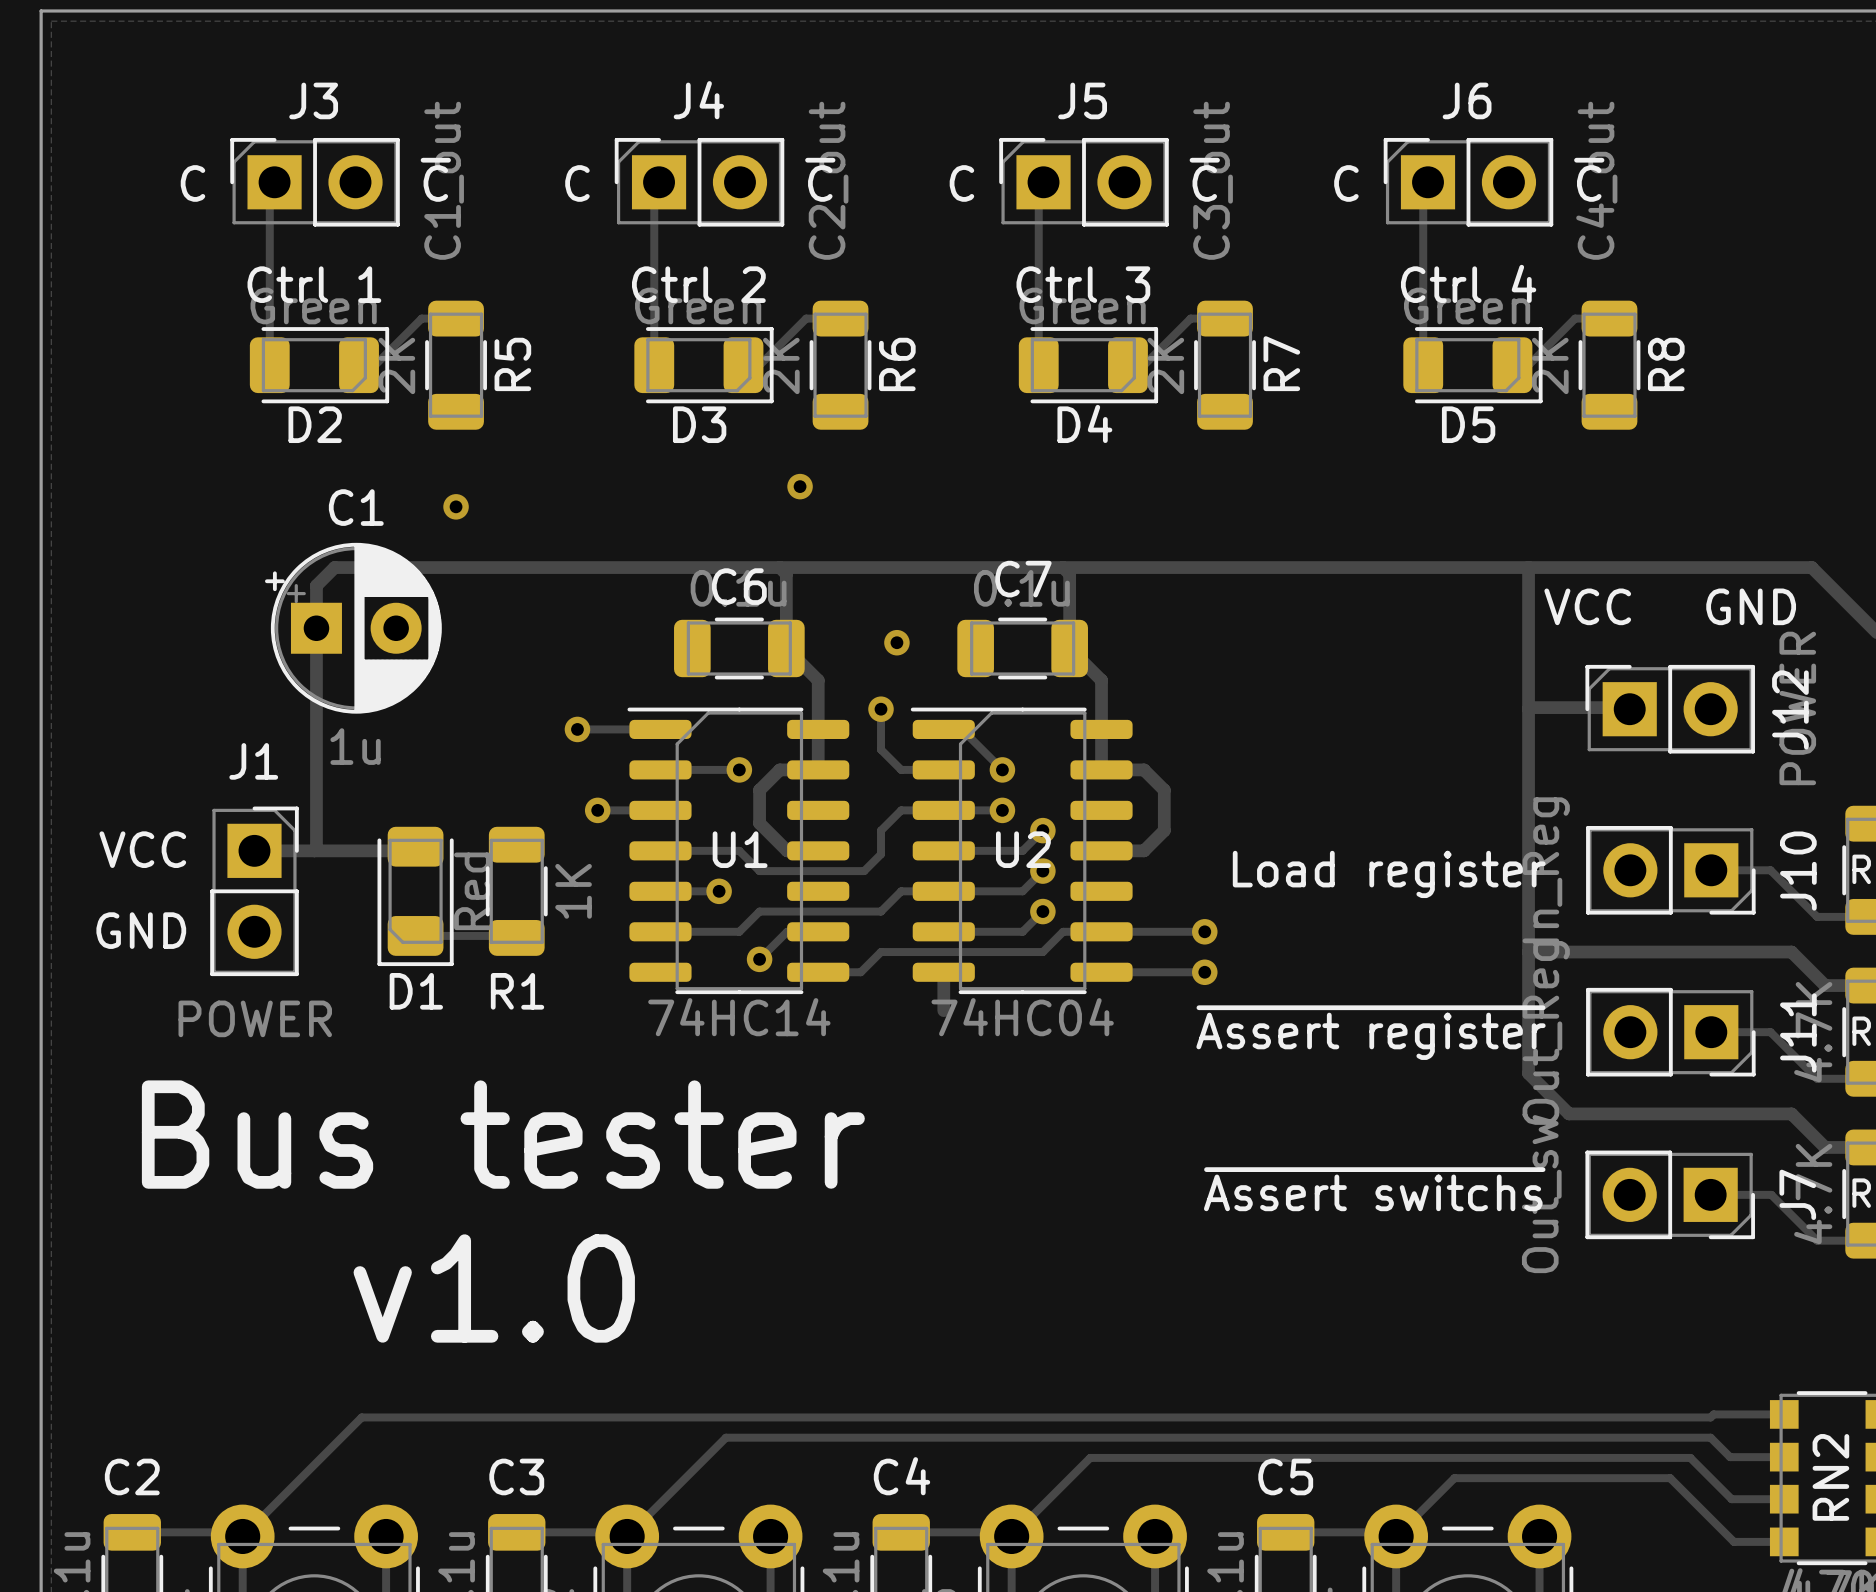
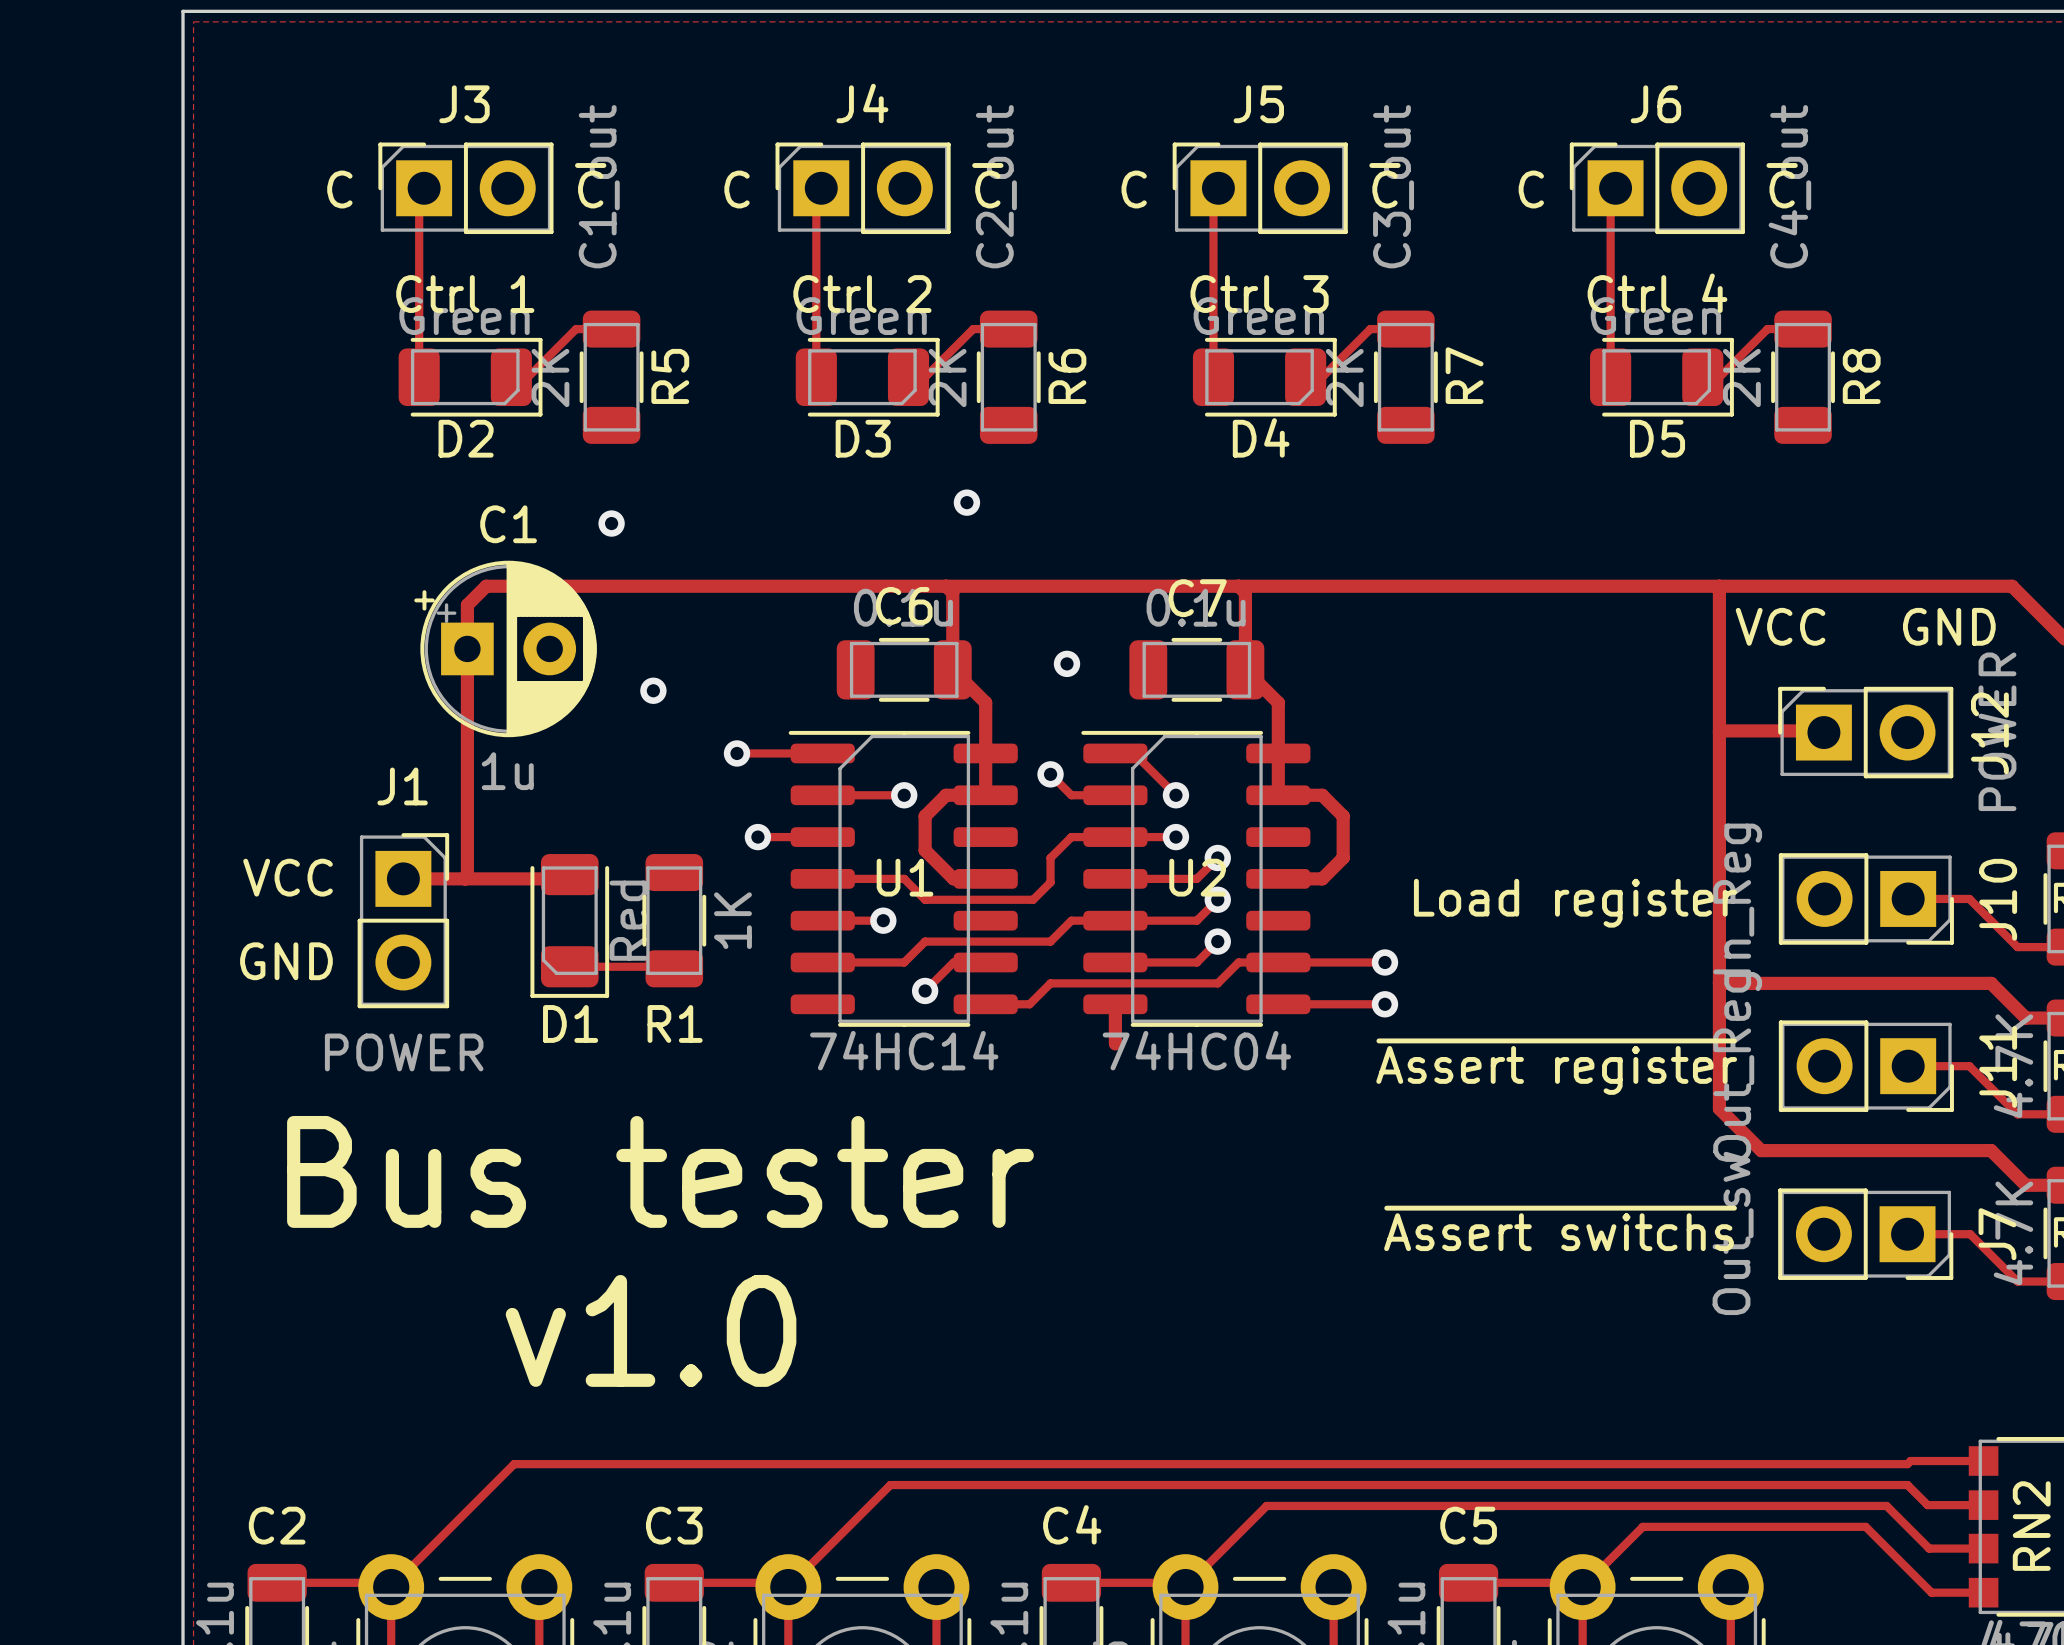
via: none -> (653, 690)
track: (881, 709) (881, 749) -> none
via position: (881, 709) -> (1050, 774)

